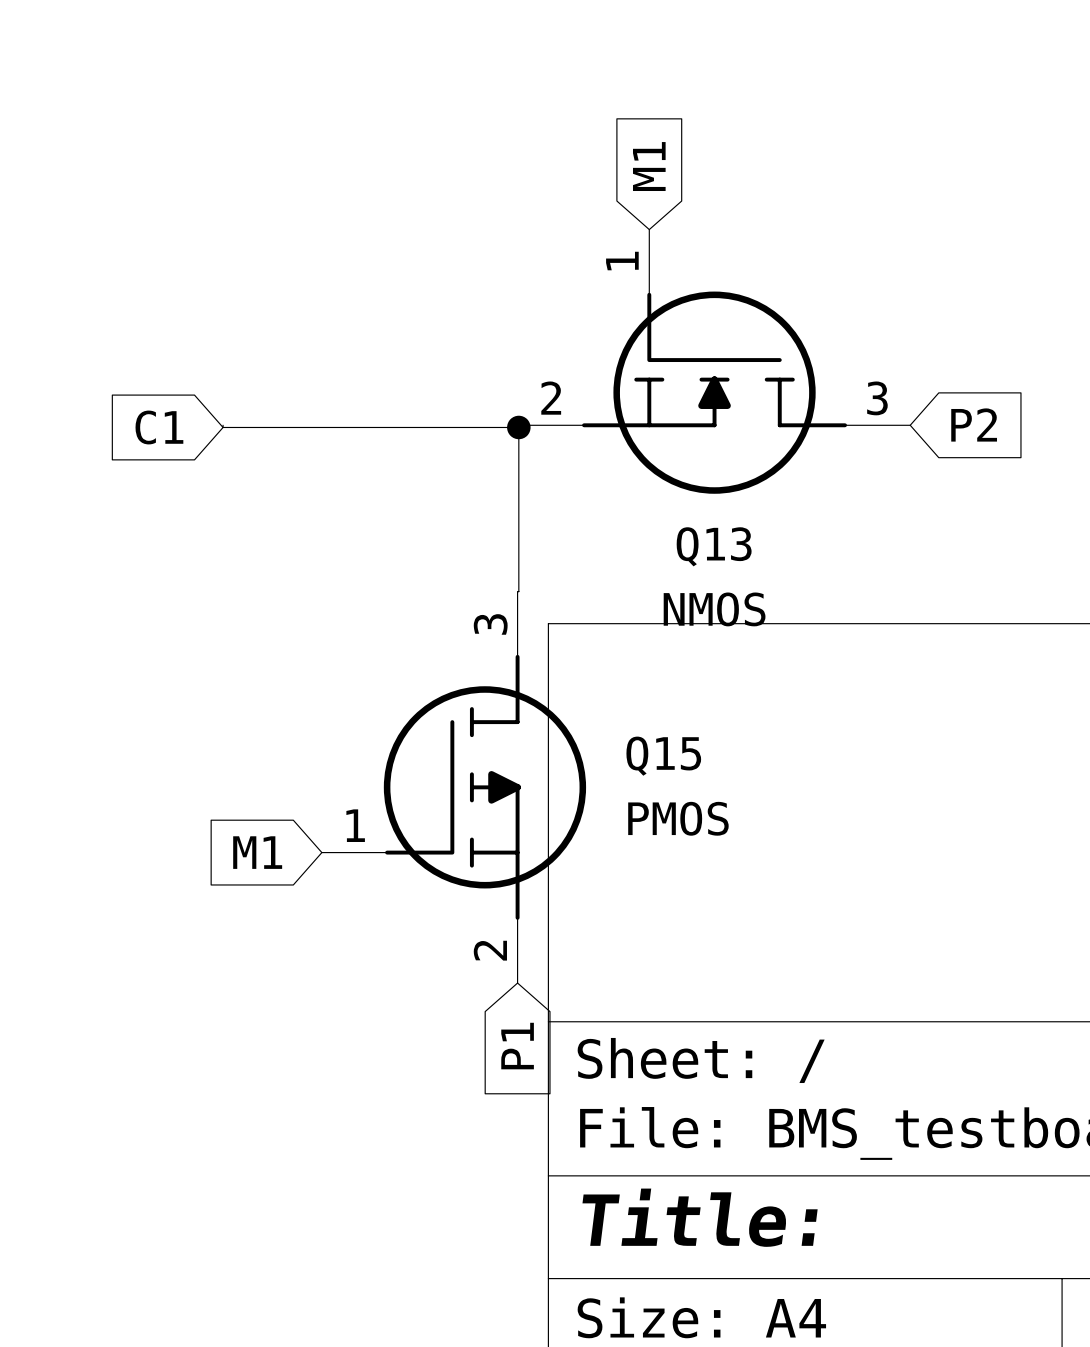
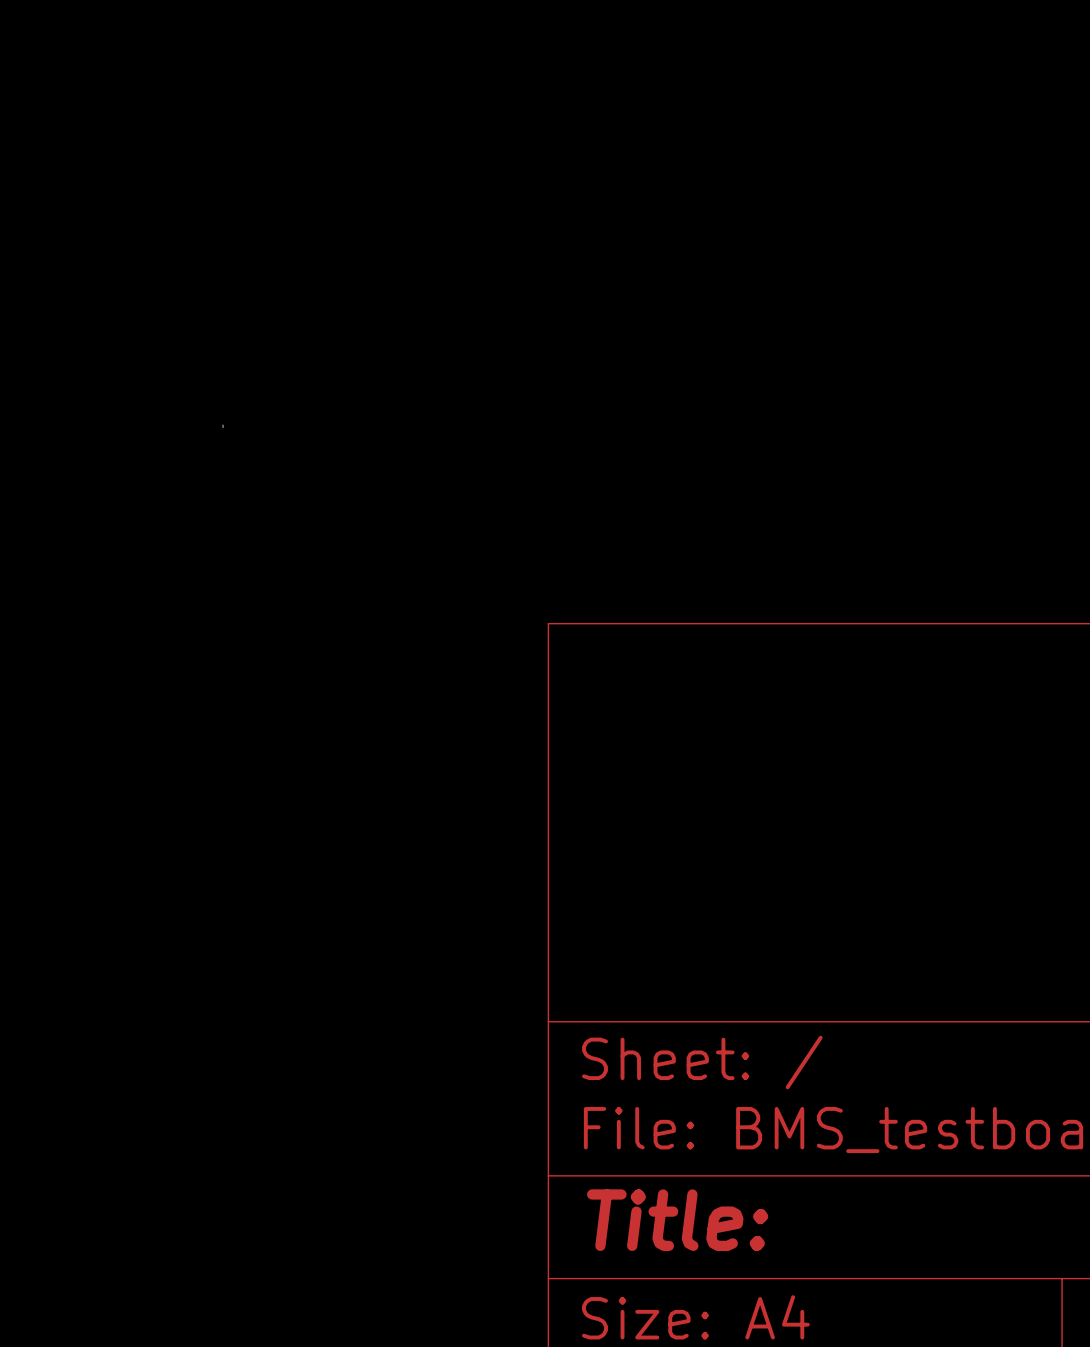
global label: M1 (649, 166) -> none
Q13: (714, 361) -> none
global label: P2 (974, 424) -> none
wire: (518, 425) (517, 591) -> none
global label: C1 (159, 427) -> none
wire: (223, 427) (518, 427) -> none
junction: (518, 427) -> none
Q15: (453, 787) -> none
global label: M1 (257, 852) -> none
global label: P1 (517, 1046) -> none

